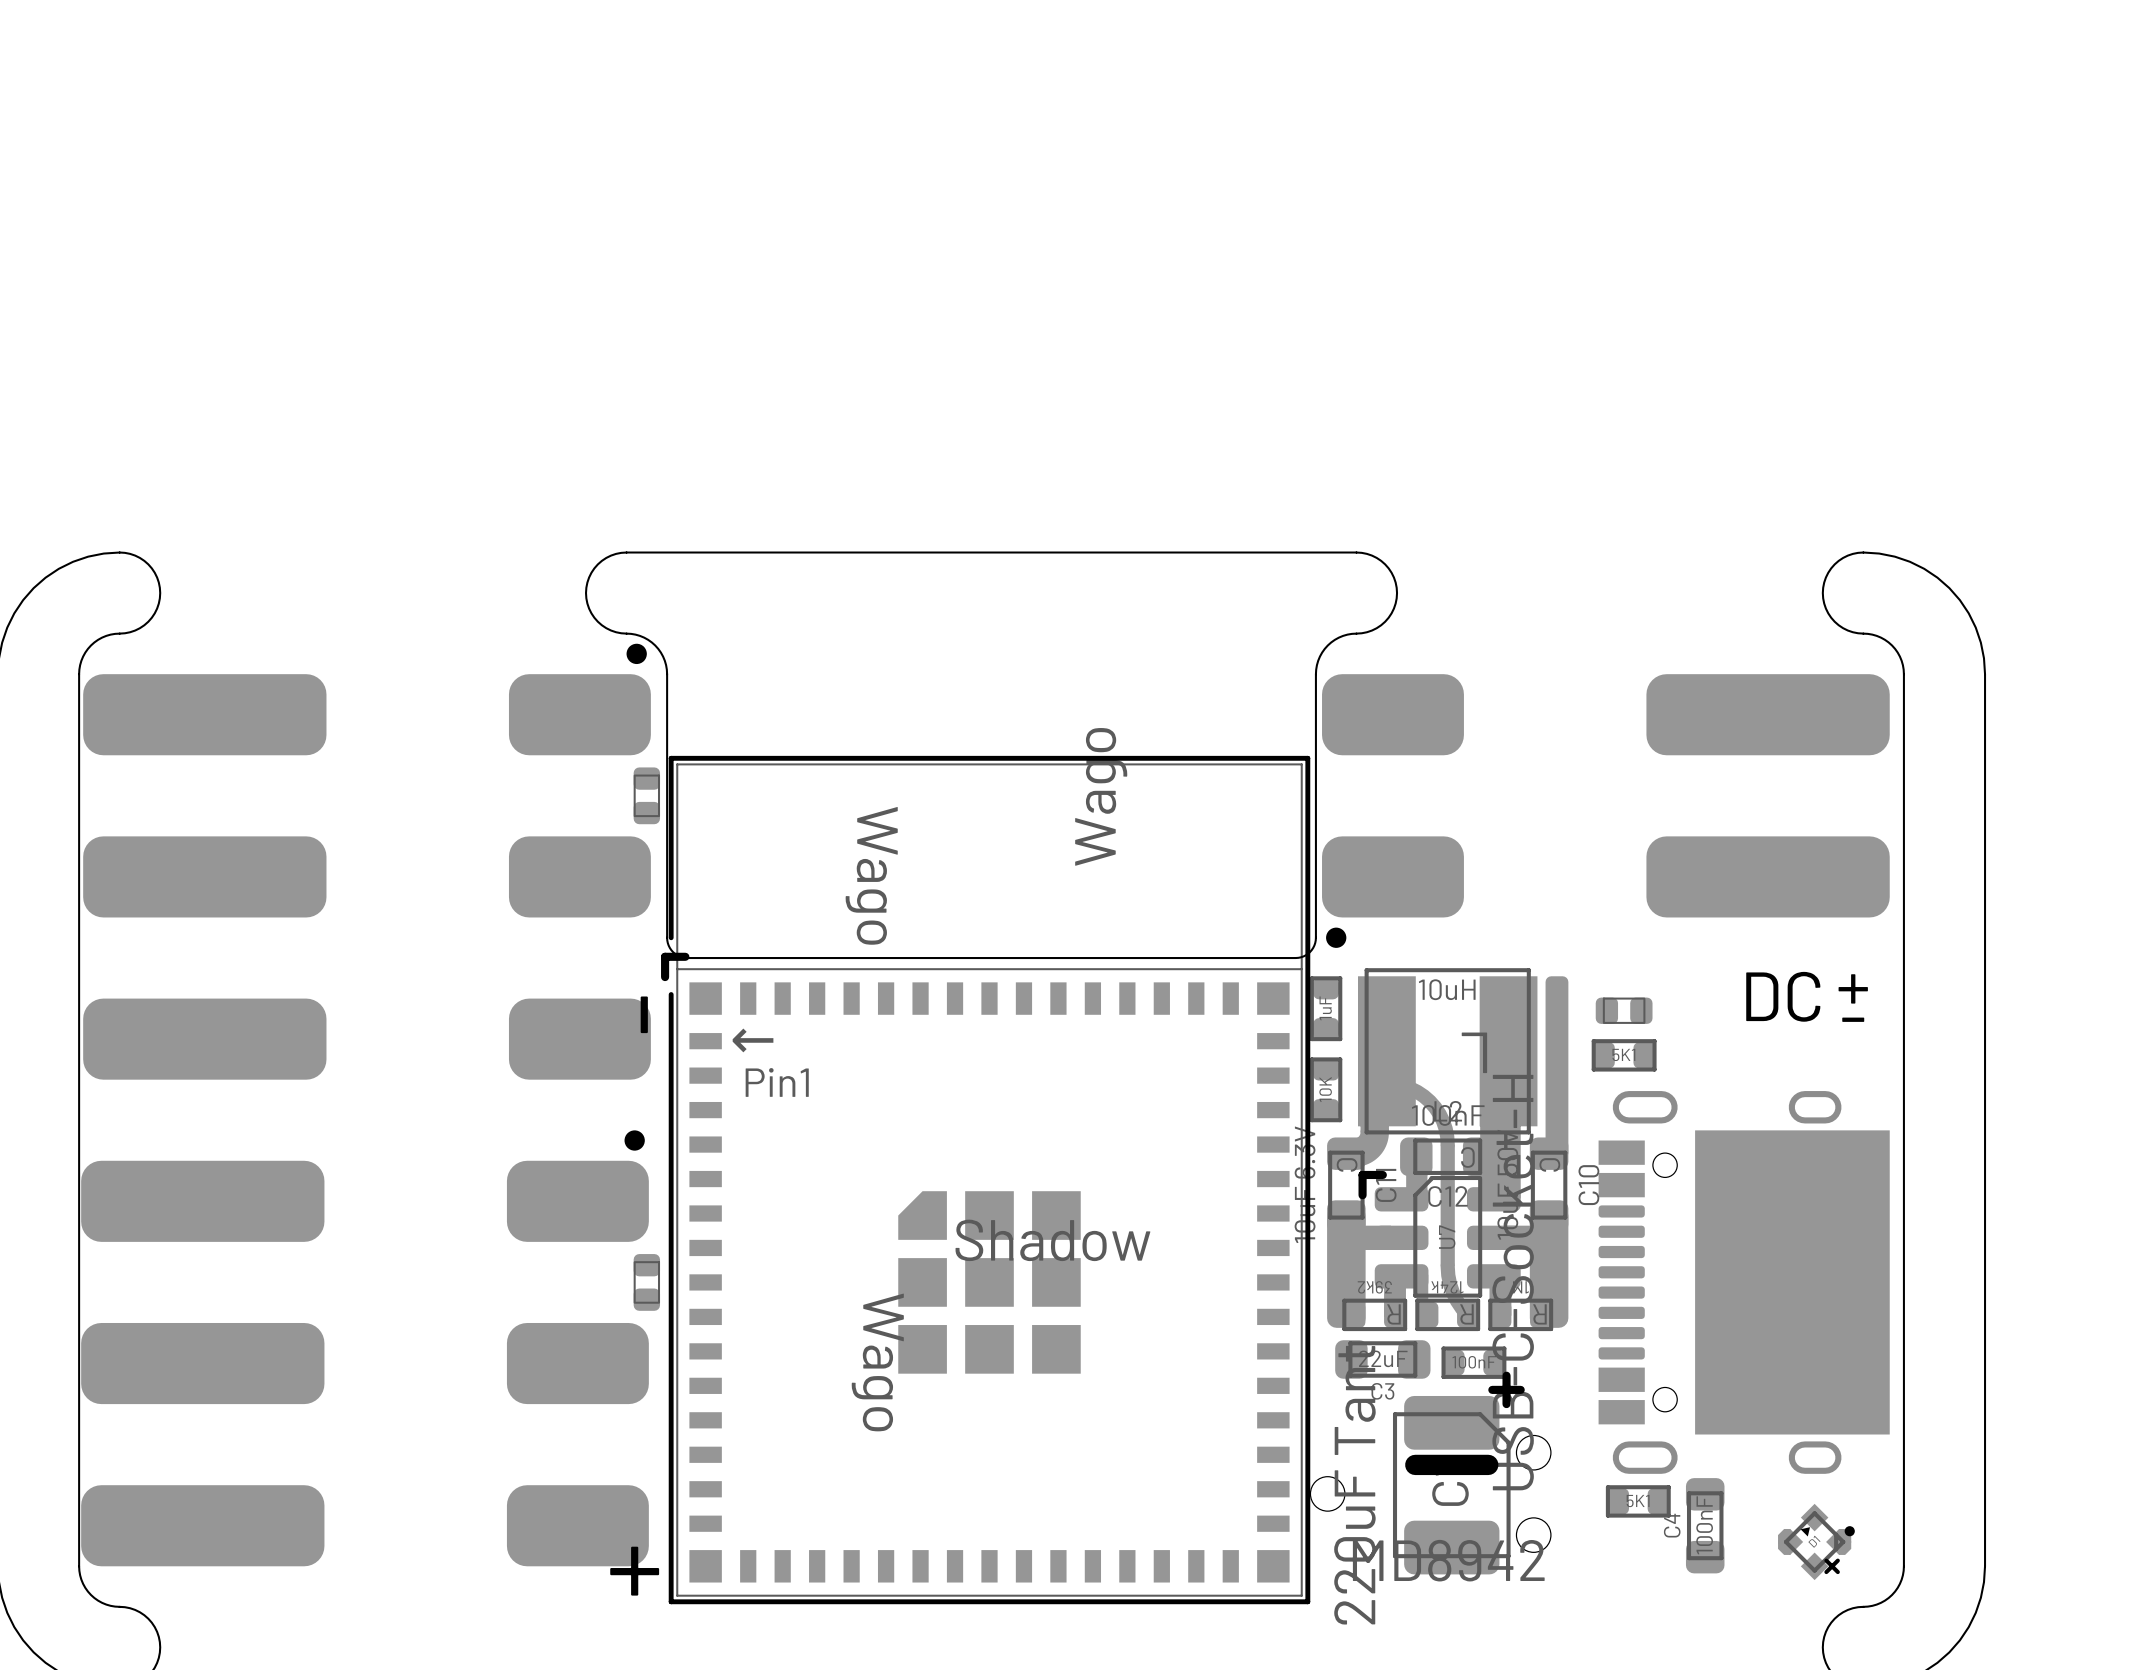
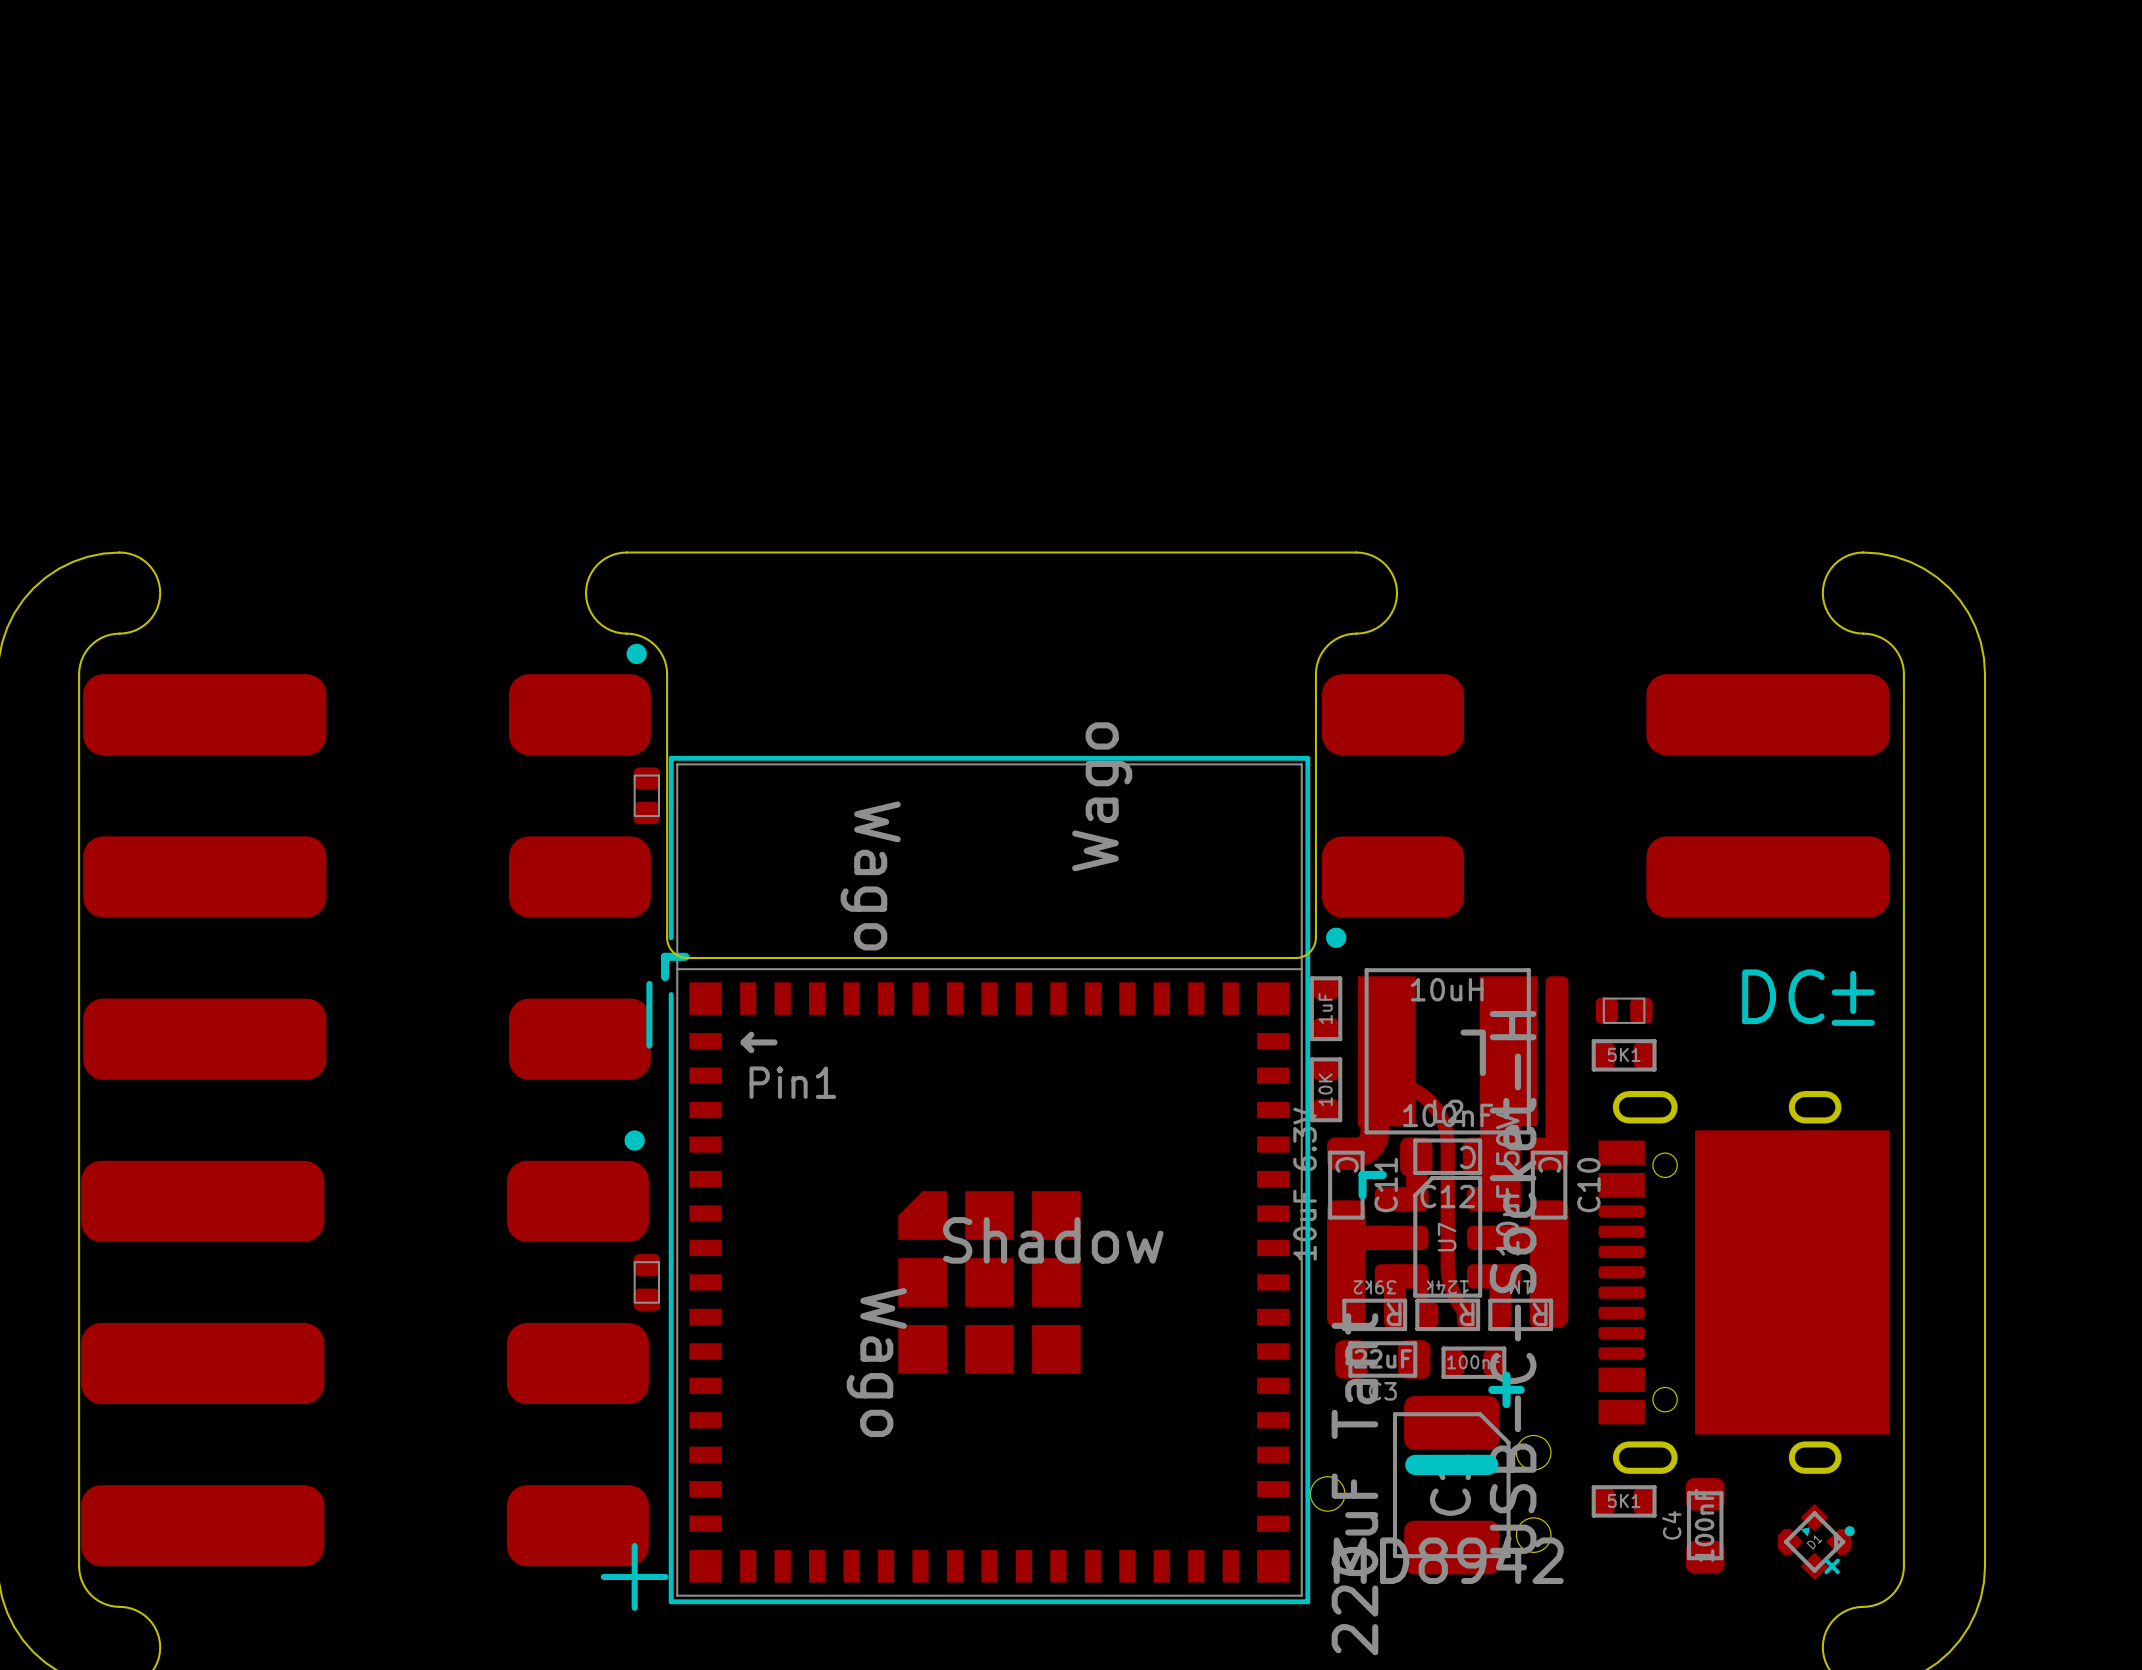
part position: (1638, 1501) -> (1624, 1501)

